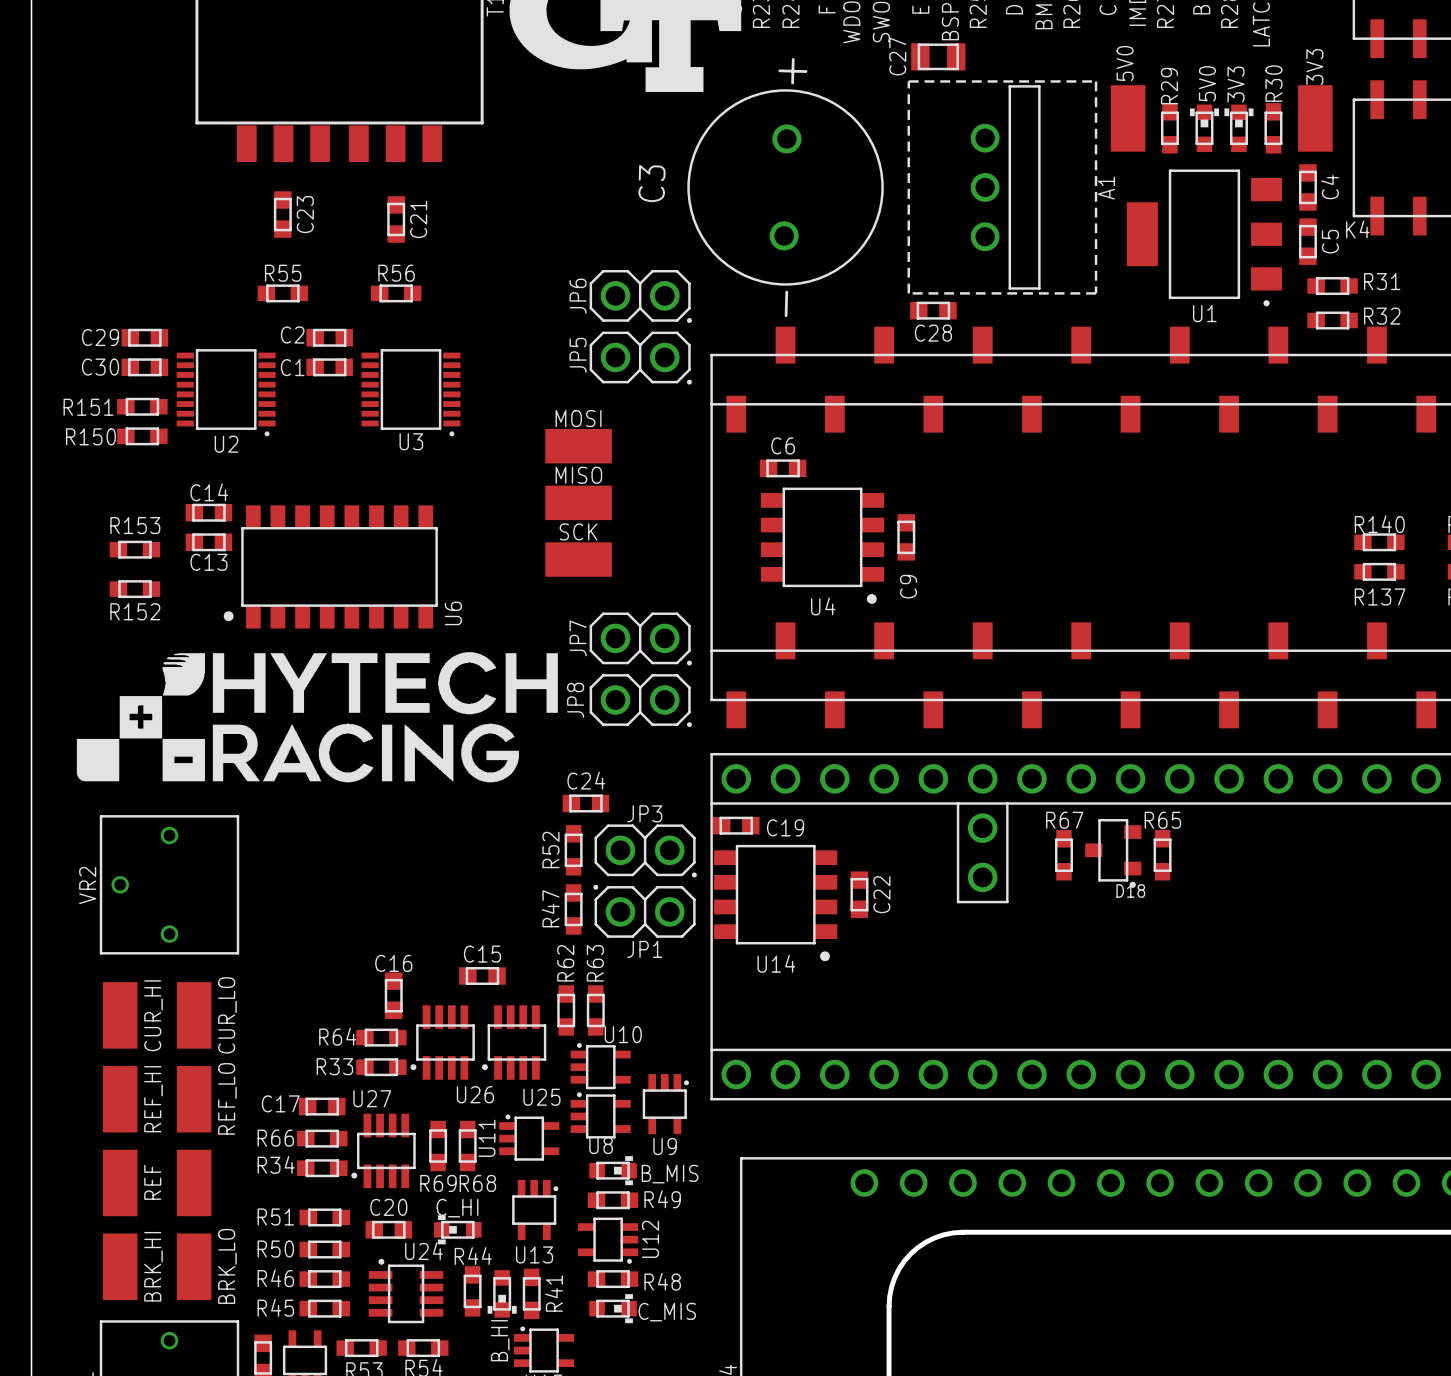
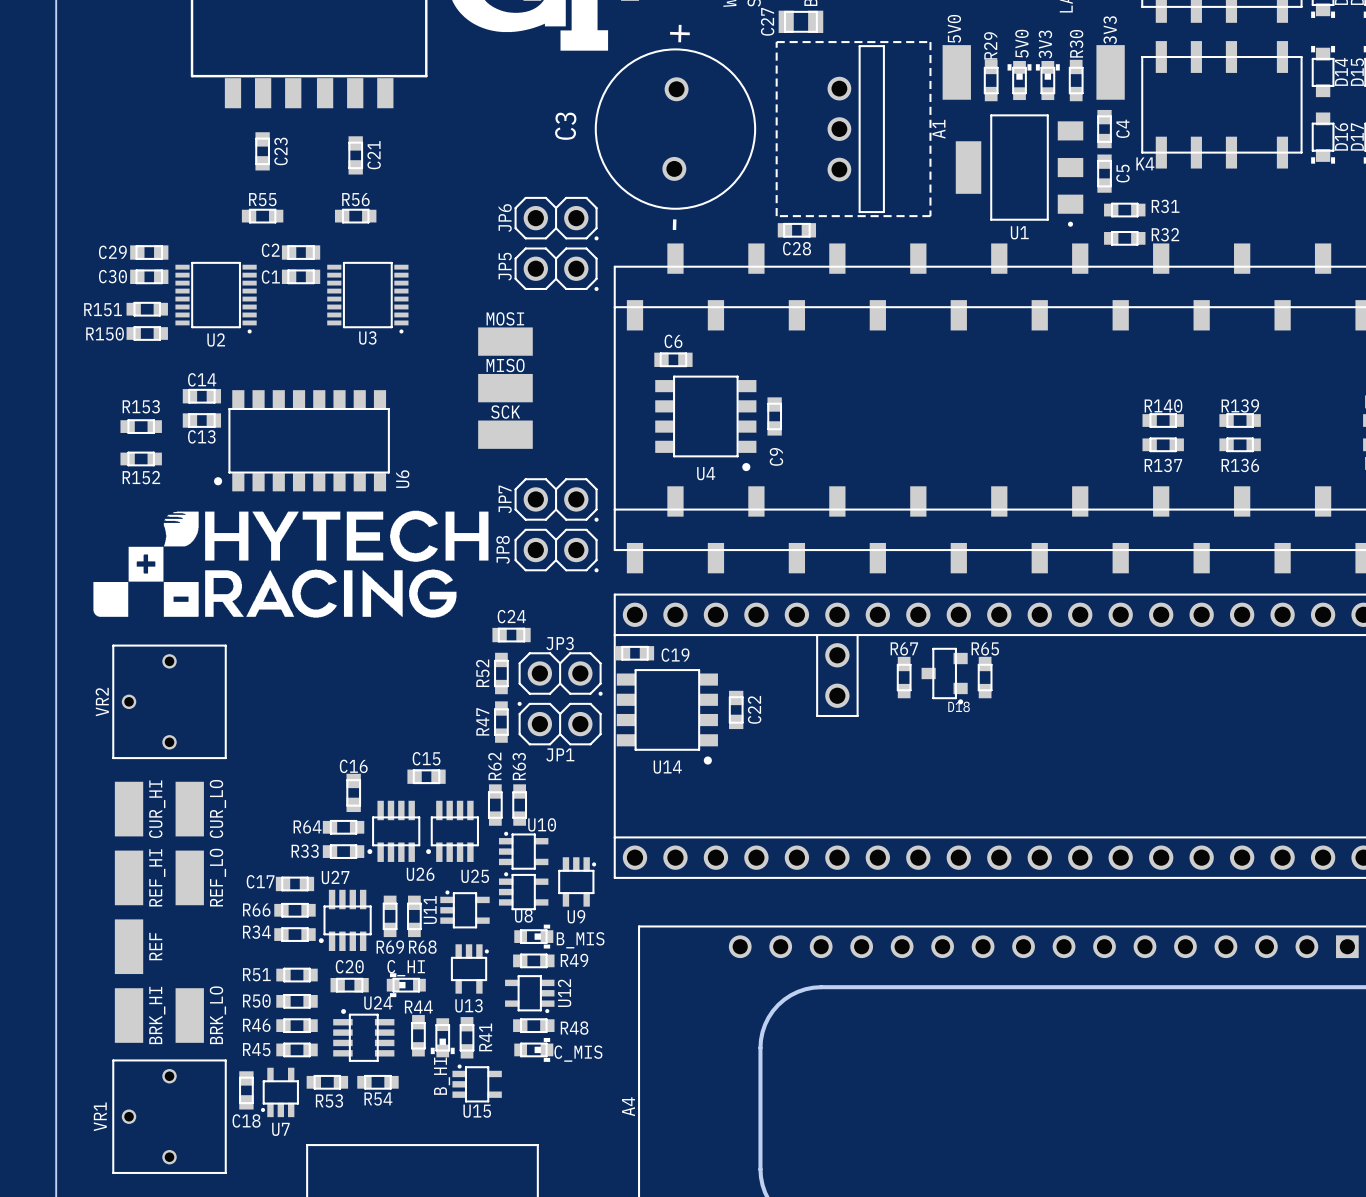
part: (194, 1182) -> none

